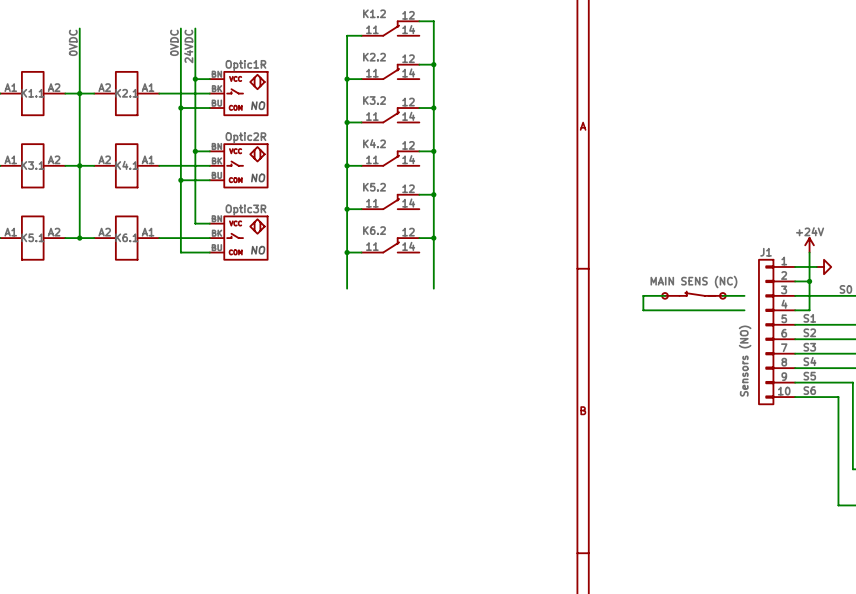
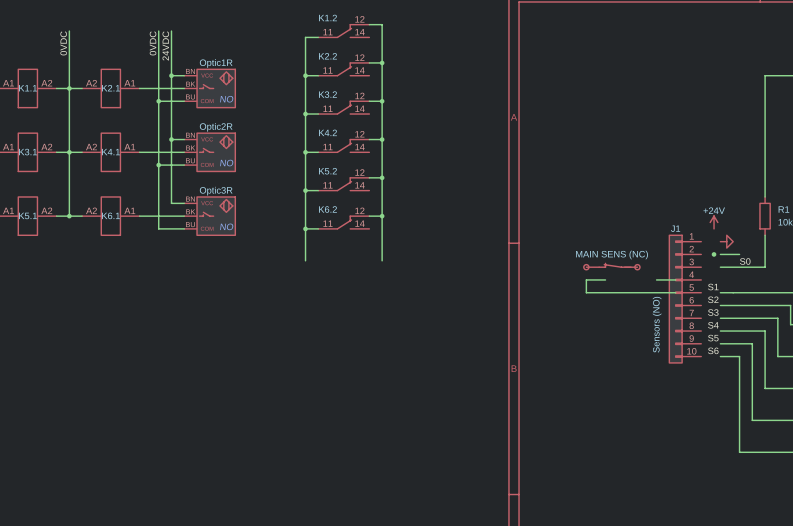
wire: (809, 252) (809, 310) (795, 310) -> none
wire: (795, 266) (816, 266) -> (720, 254) (739, 254)
wire: (795, 281) (809, 281) -> none
wire: (665, 295) (643, 295) (643, 310) (665, 310) -> (675, 292) (586, 292) (586, 279)
wire: (722, 295) (744, 295) -> none
wire: (795, 295) (816, 295) -> none
wire: (686, 310) (744, 310) -> (675, 279) (656, 279)
wire: (795, 324) (816, 324) -> none
wire: (795, 339) (816, 339) -> none
wire: (795, 353) (816, 353) -> none
wire: (795, 368) (816, 368) -> none
wire: (795, 382) (816, 382) -> none
wire: (795, 397) (816, 397) -> none

